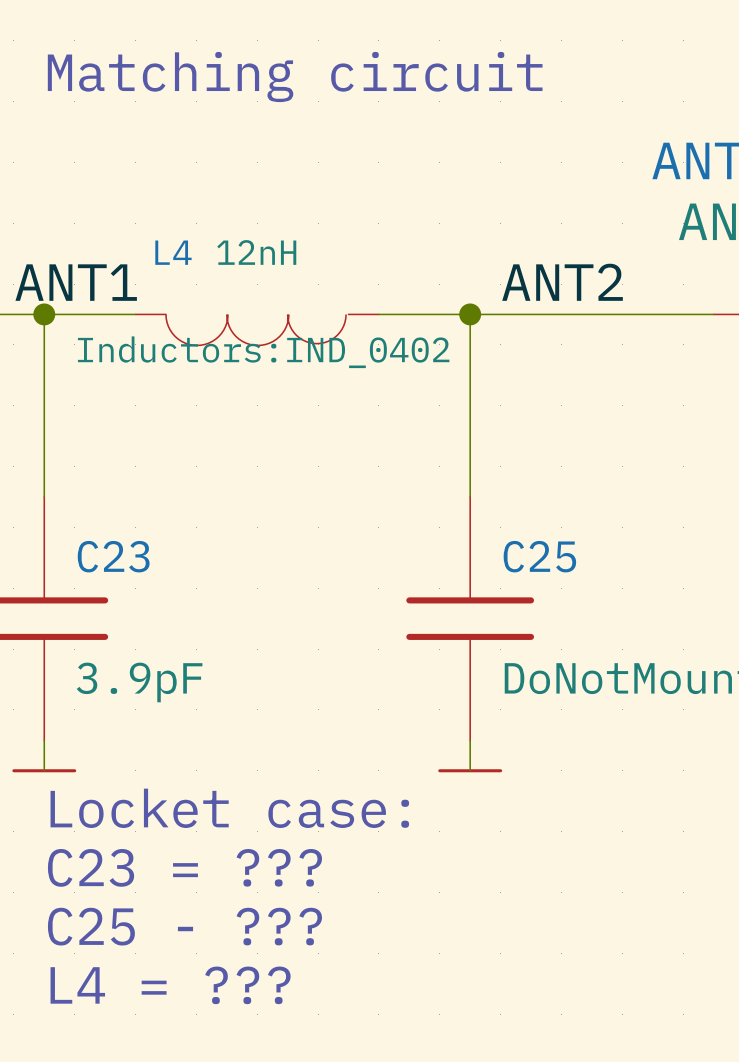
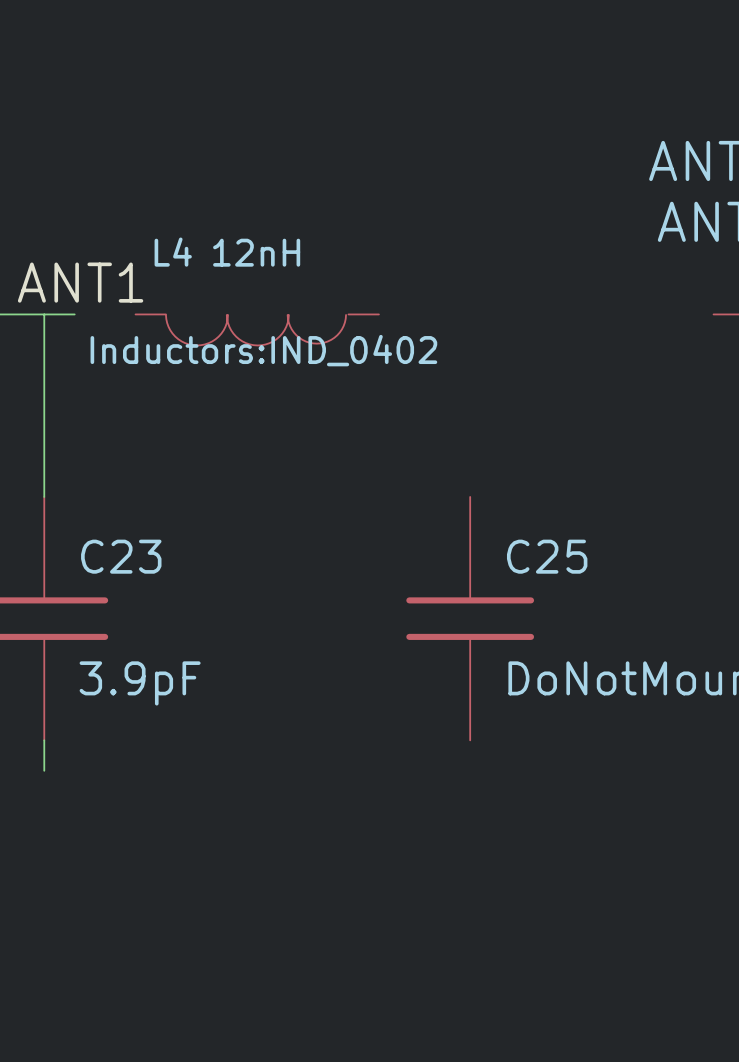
text: Matching circuit (295, 77) -> none
label: ANT2 (562, 282) -> none
junction: (44, 314) -> none
wire: (74, 314) (135, 314) -> none
wire: (378, 314) (713, 314) -> none
wire: (470, 314) (470, 496) -> none
junction: (470, 314) -> none
wire: (470, 740) (470, 770) -> none
power symbol: (44, 770) -> none
power symbol: (470, 770) -> none
text: Locket case: (229, 808) -> none
text: C23 = ??? (184, 867) -> none
text: C25 - ??? (184, 926) -> none
text: L4 = ??? (170, 985) -> none

